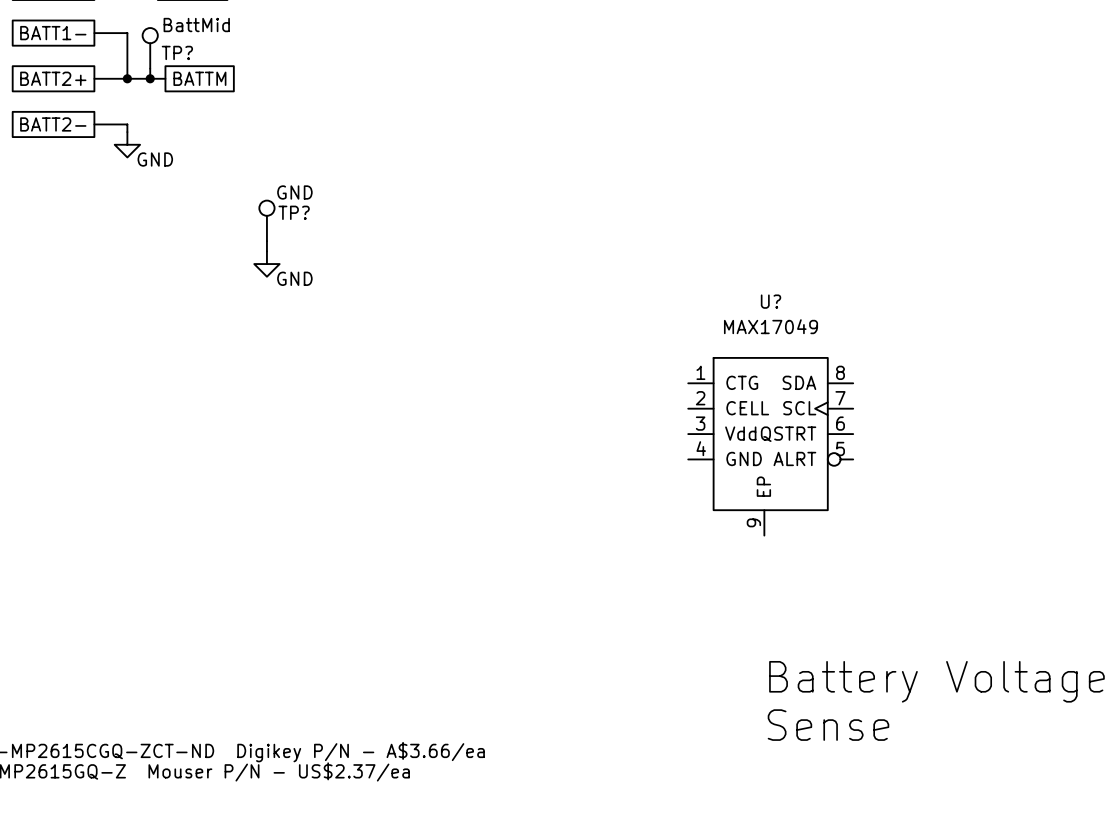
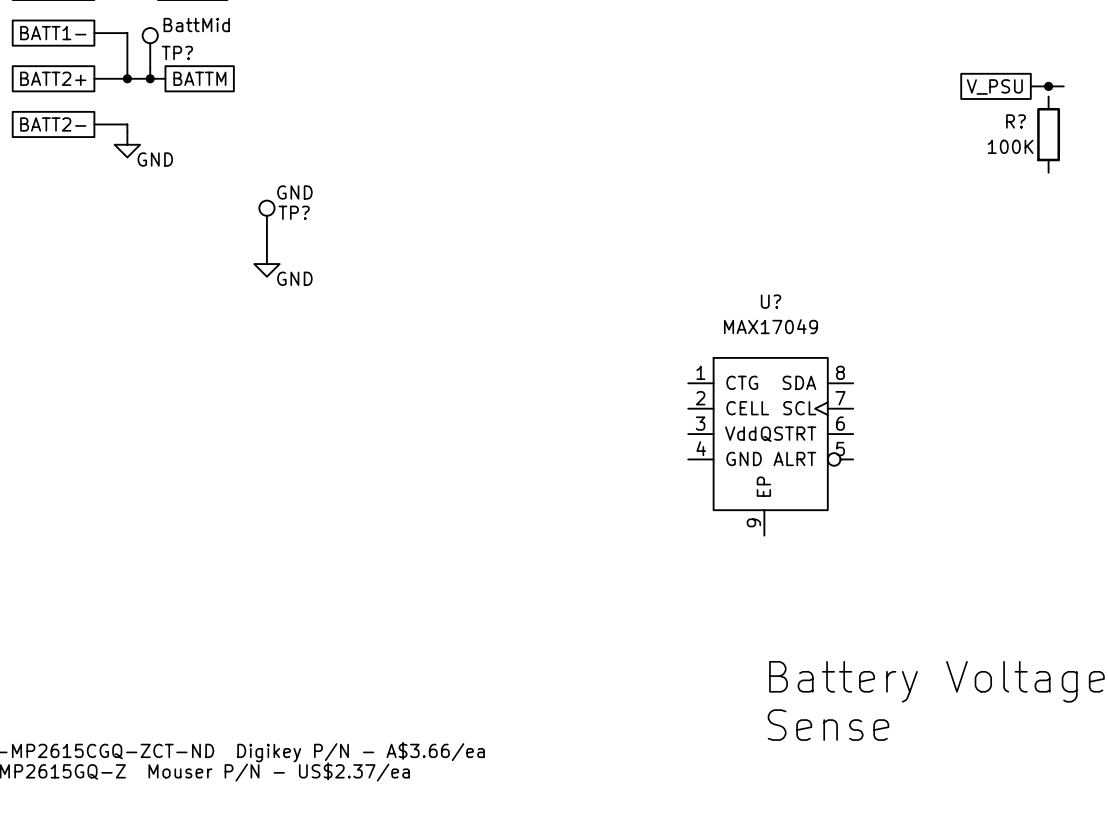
wire: none -> (1030, 86) (1063, 86)
junction: none -> (1048, 86)
global label: none -> V_PSU (994, 87)
R?: none -> 100K (1048, 134)

